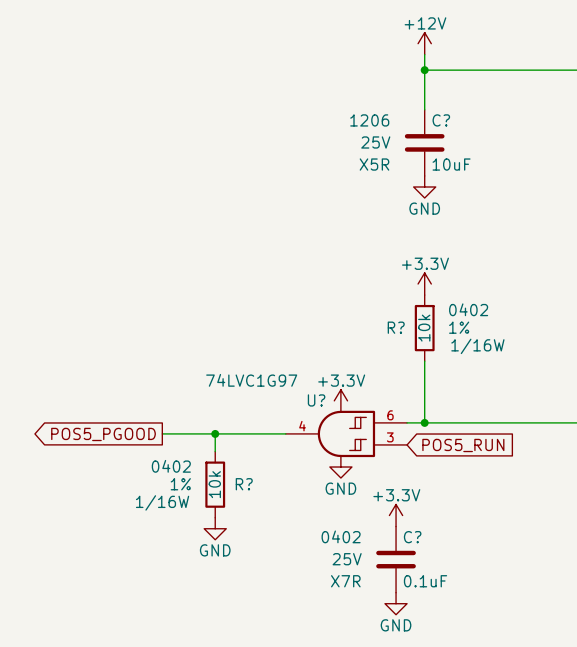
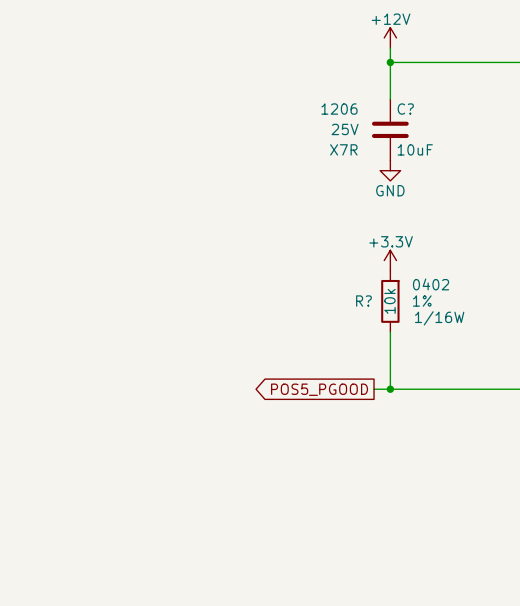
C? text: X5R (374, 164) -> X7R (343, 149)
power symbol: +3.3V (340, 400) -> none
global label: none -> POS5_PGOOD (319, 389)
wire: (162, 433) (285, 433) -> none
wire: (215, 433) (215, 451) -> none
junction: (215, 433) -> none
U?: 74LVC1G97 (346, 433) -> none
global label: POS5_PGOOD (103, 434) -> none
global label: POS5_RUN (463, 445) -> none
power symbol: GND (340, 467) -> none
R?: 10k (215, 484) -> none
power symbol: +3.3V (396, 515) -> none
power symbol: GND (215, 528) -> none
C?: 0.1uF (396, 559) -> none
power symbol: GND (396, 603) -> none

